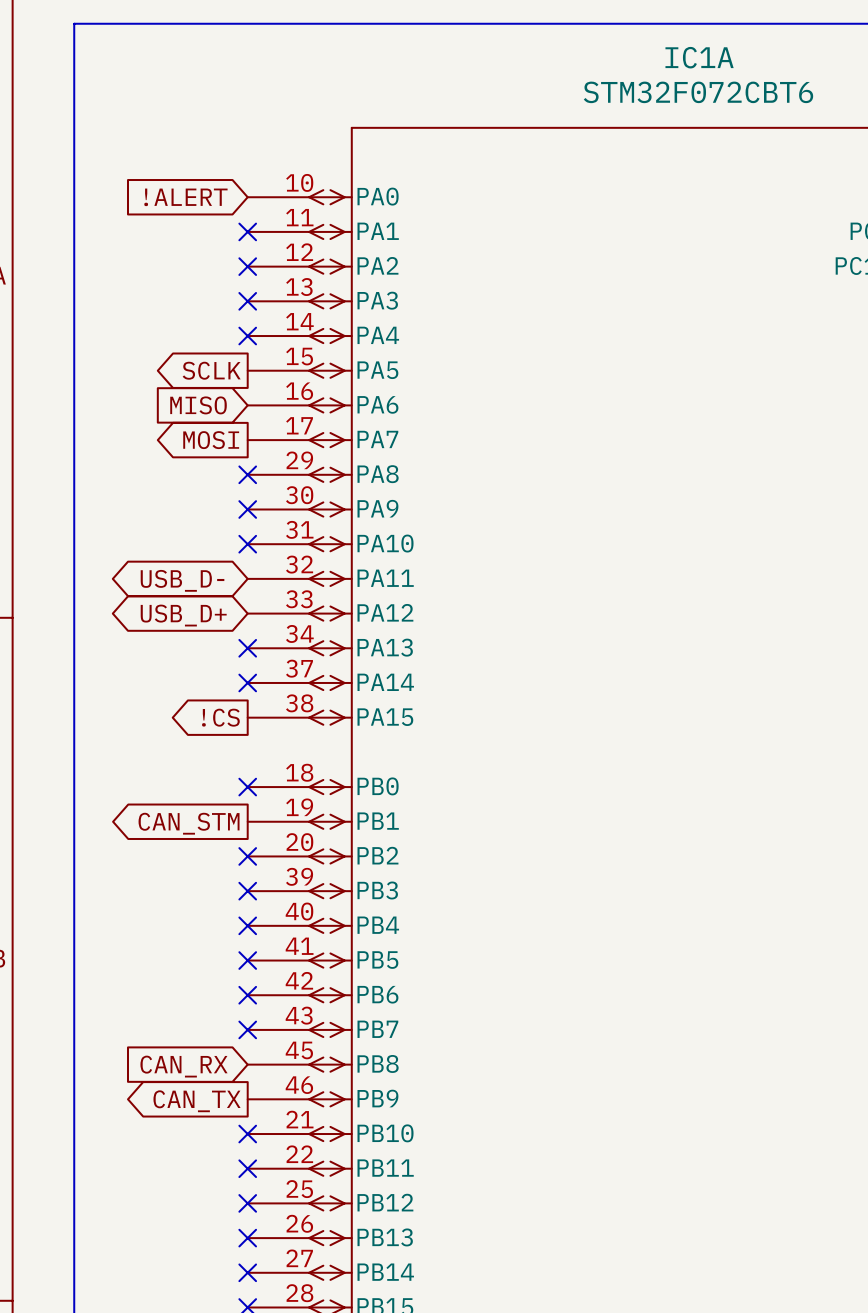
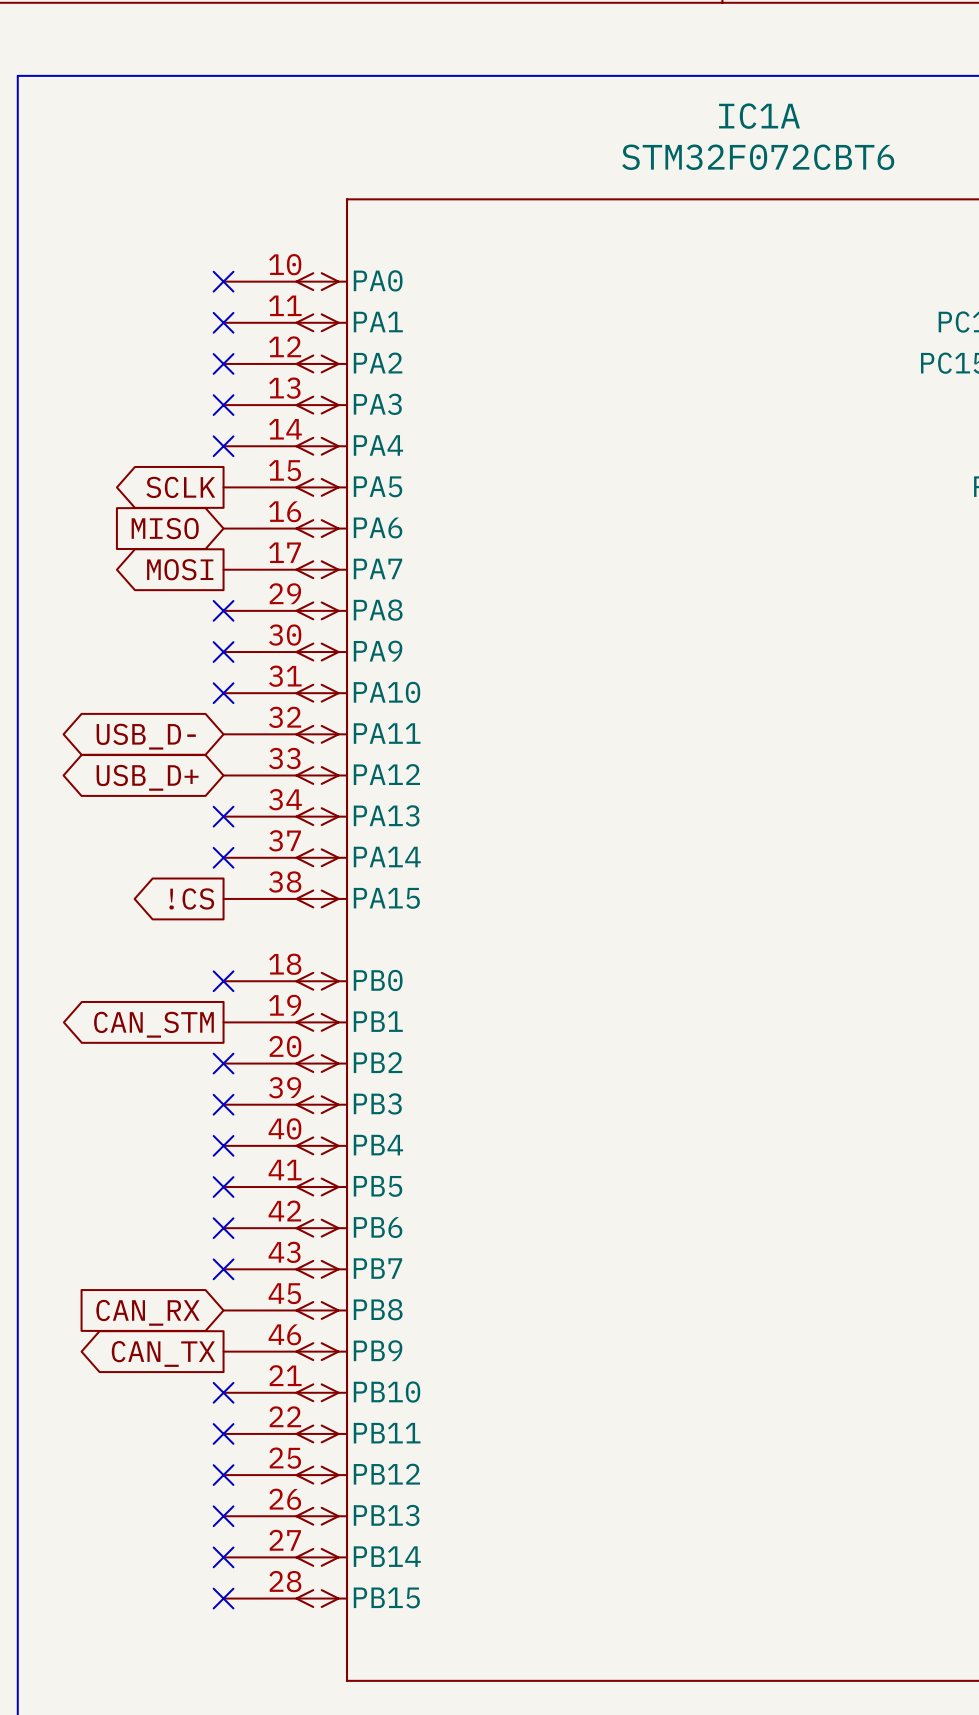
global label: !ALERT (185, 197) -> none
no-connect mark: none -> (223, 281)

